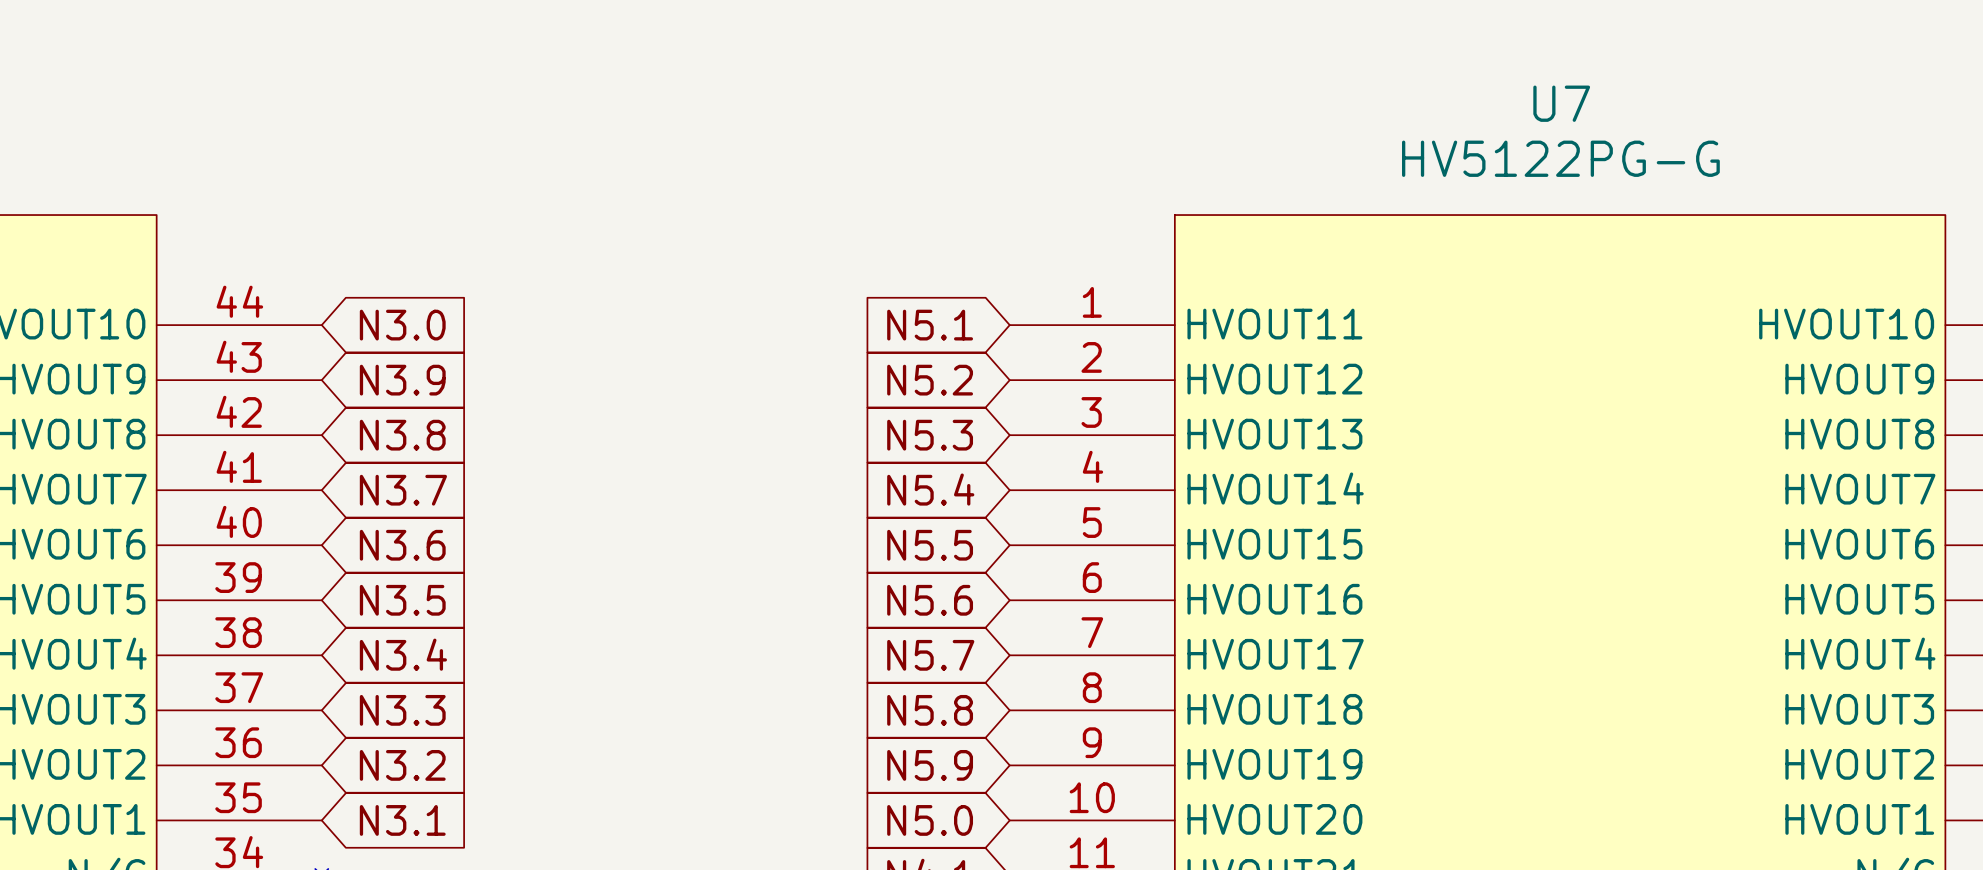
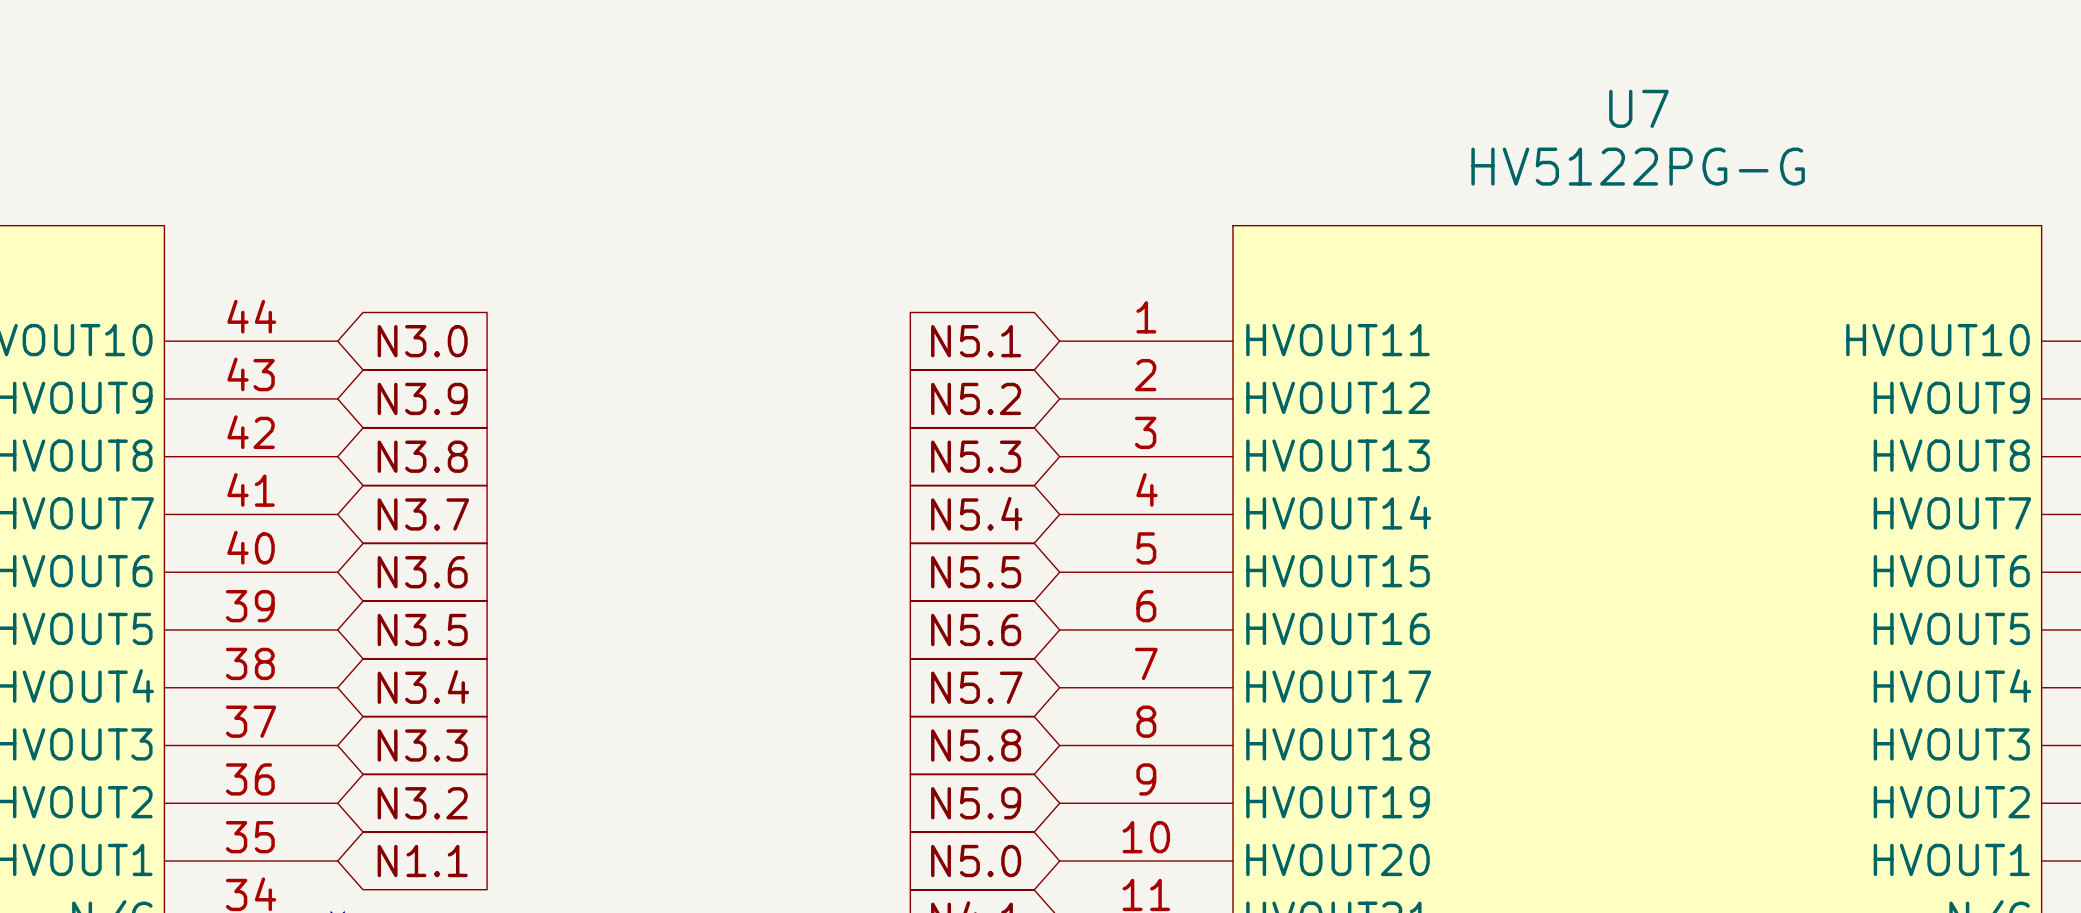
global label: N3.1 (402, 820) -> N1.1 (422, 861)

